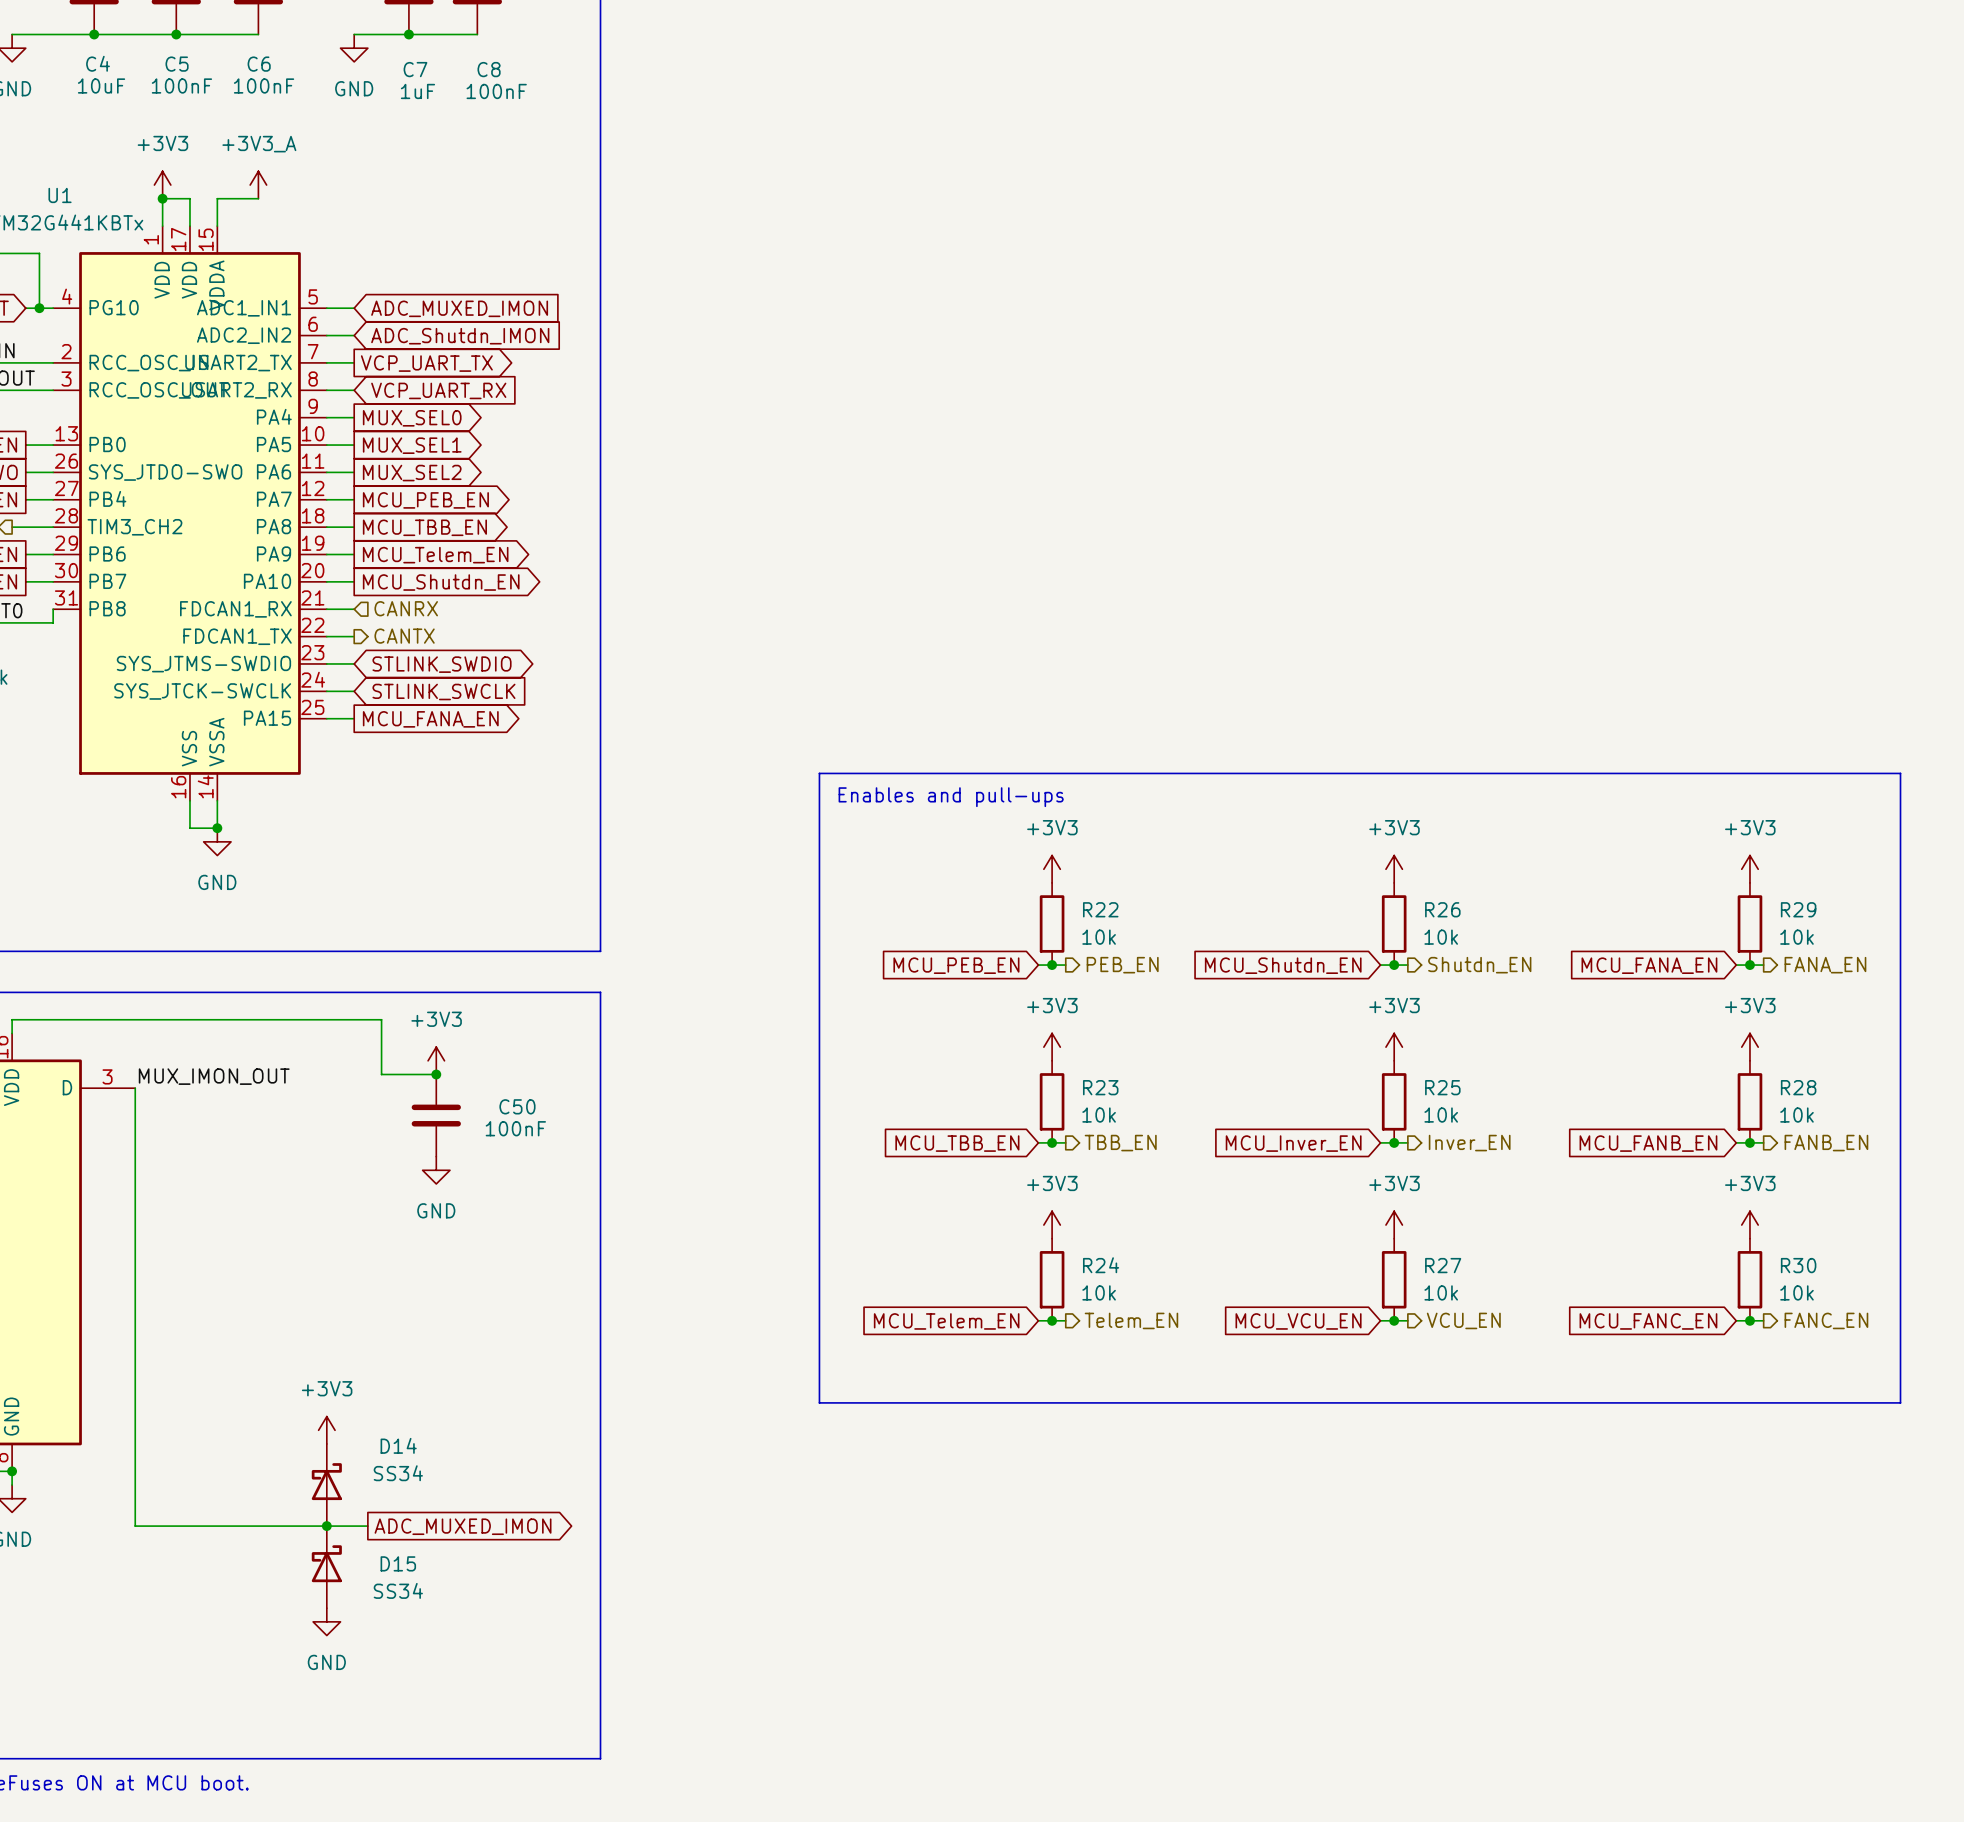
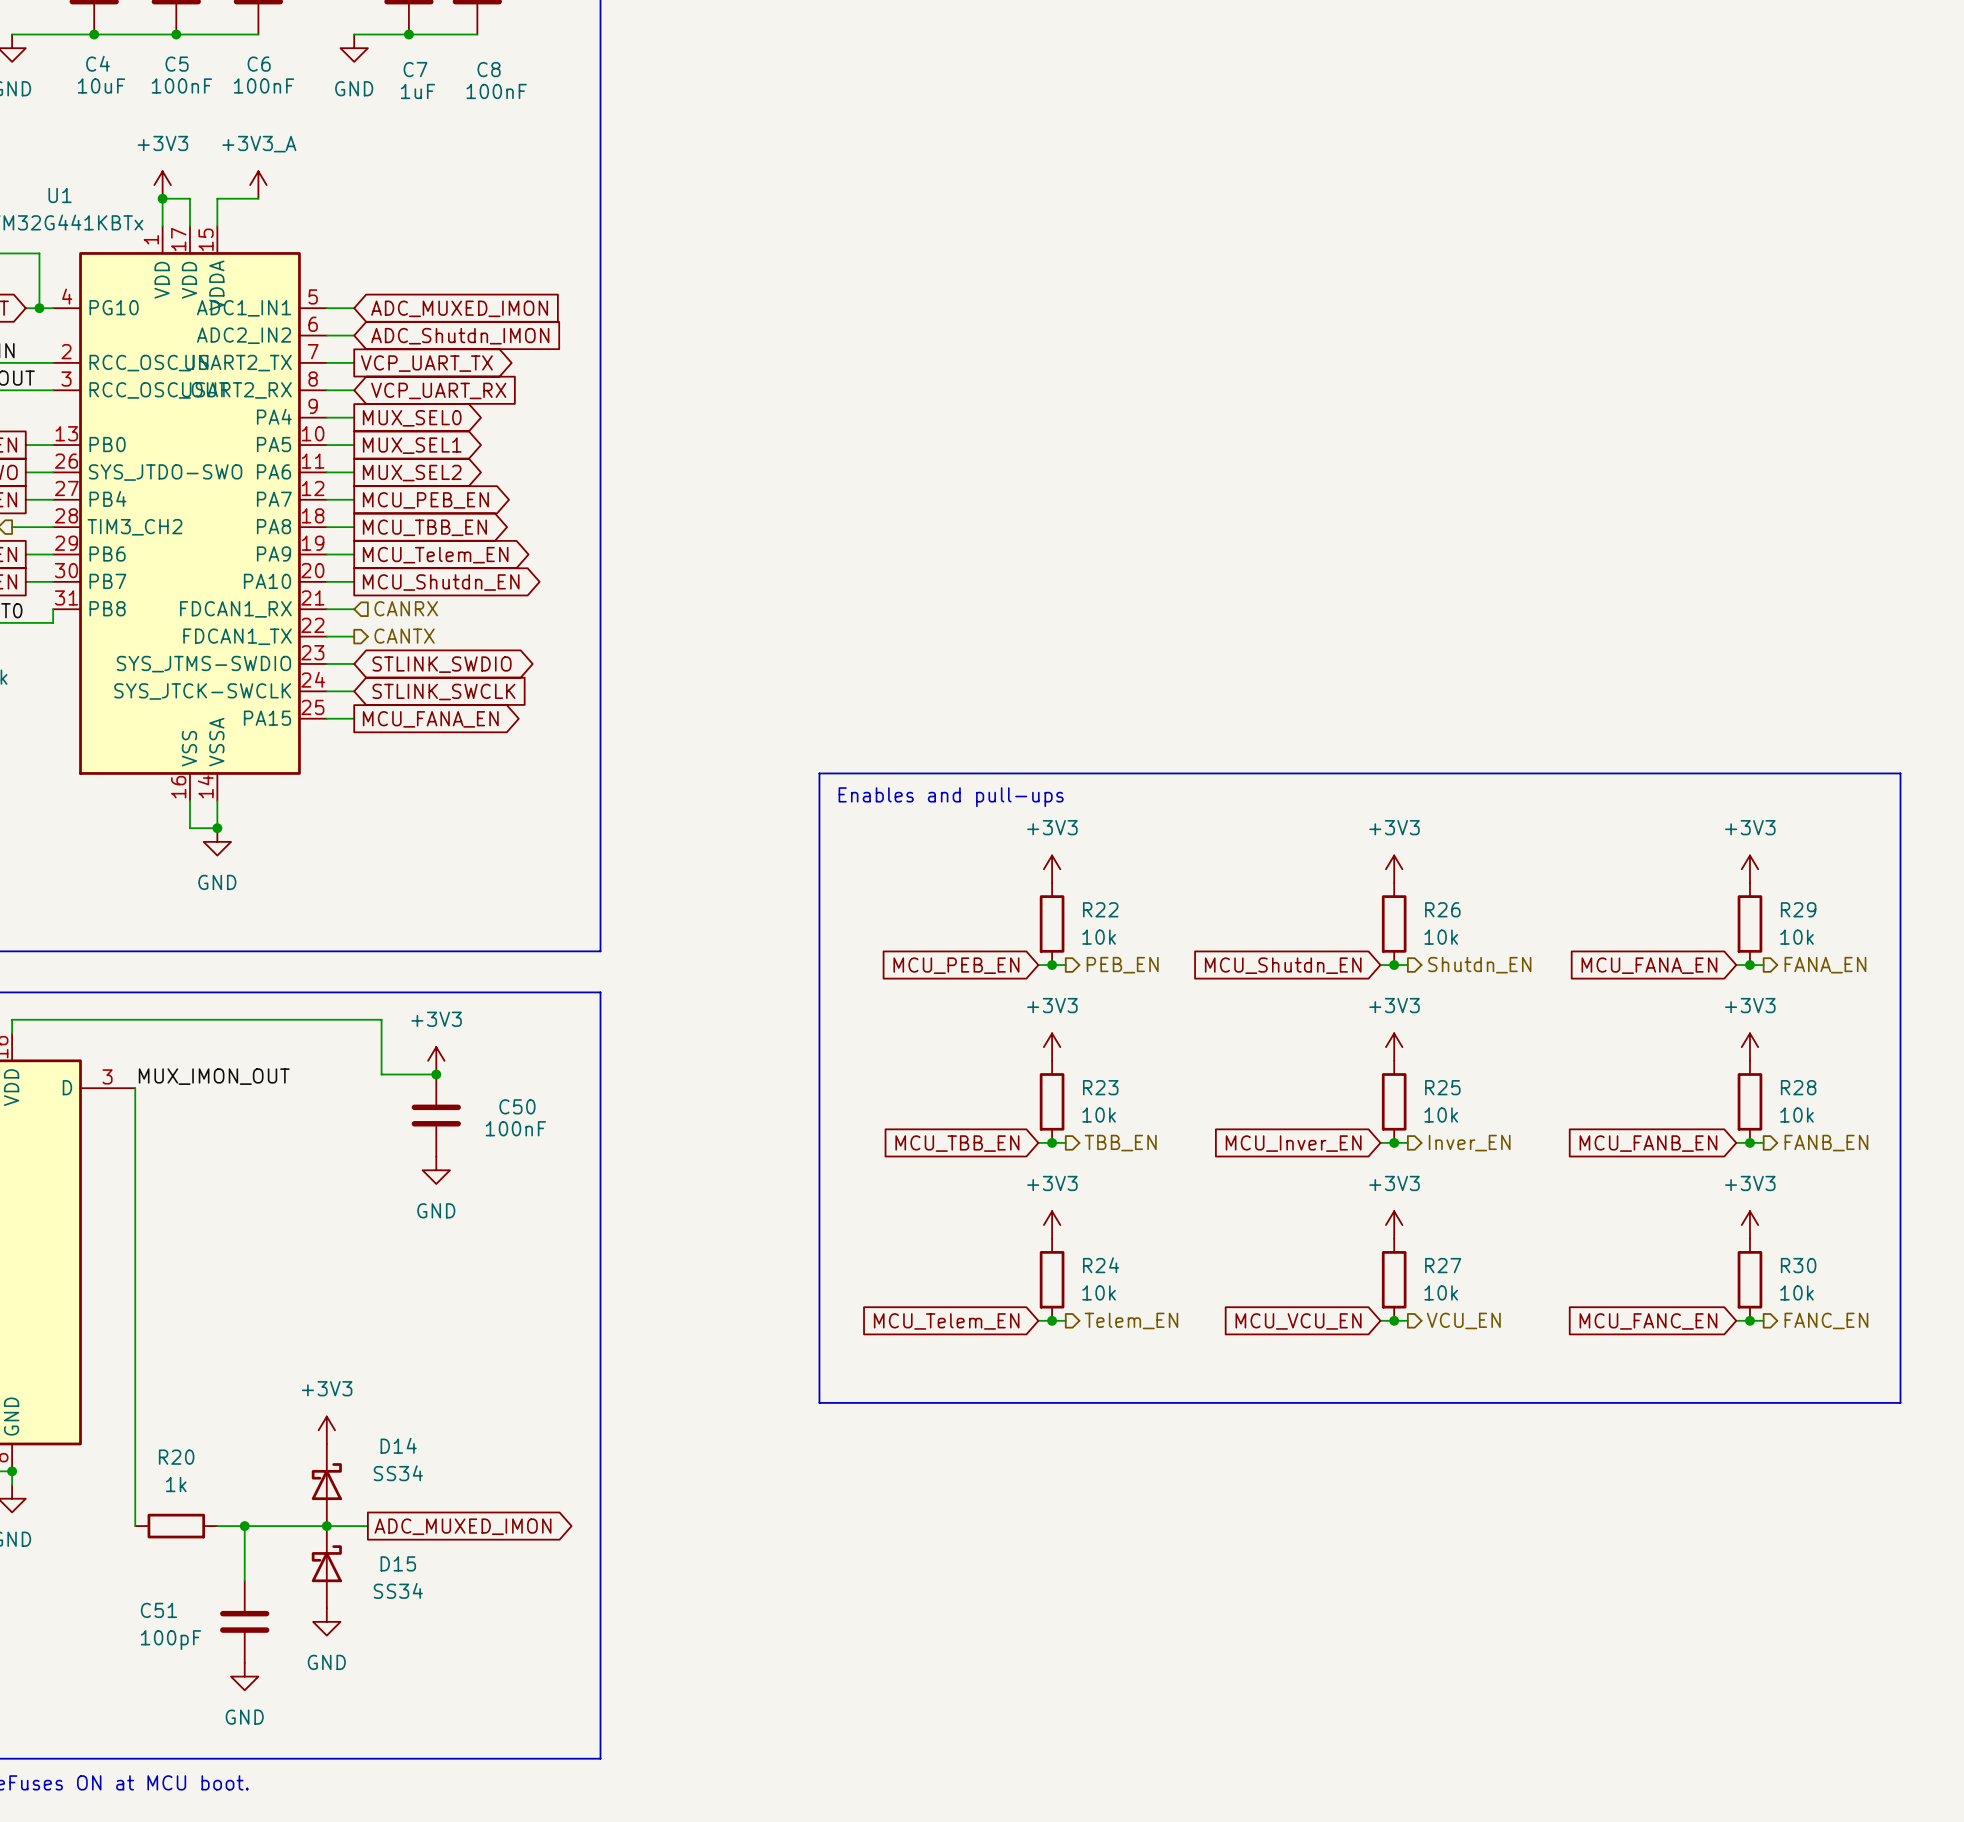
wire: (135, 1526) (217, 1526) -> none
R20: none -> 1k (176, 1526)
wire: none -> (244, 1526) (244, 1580)
junction: none -> (244, 1526)
C51: none -> 100pF (244, 1621)
power symbol: none -> GND (244, 1676)

